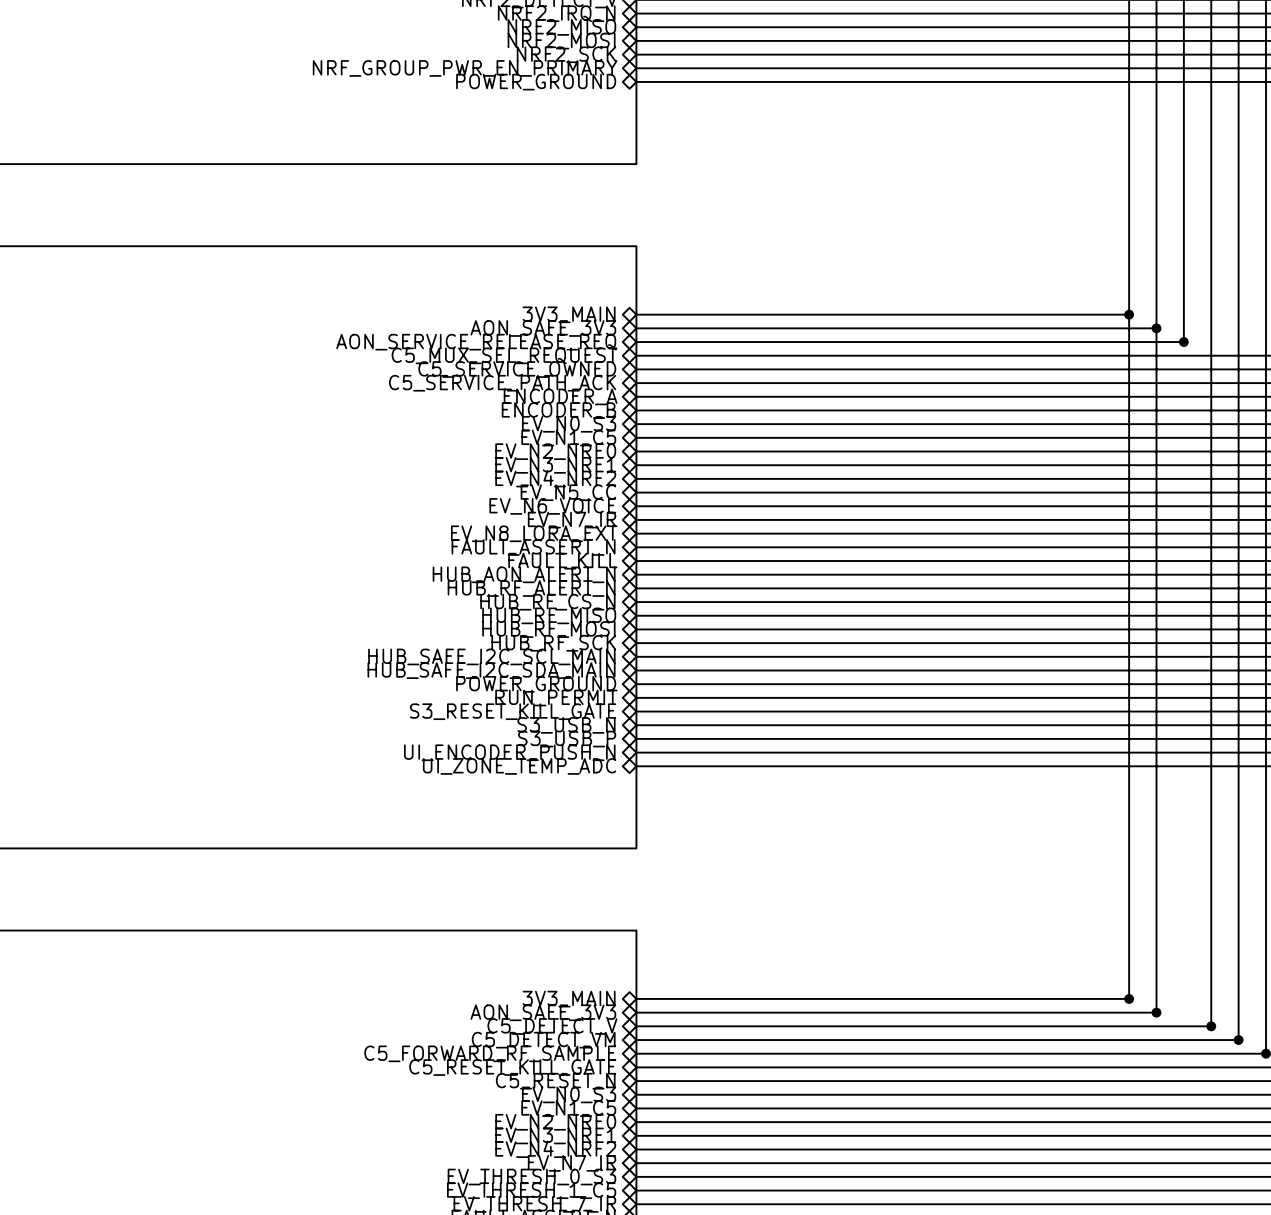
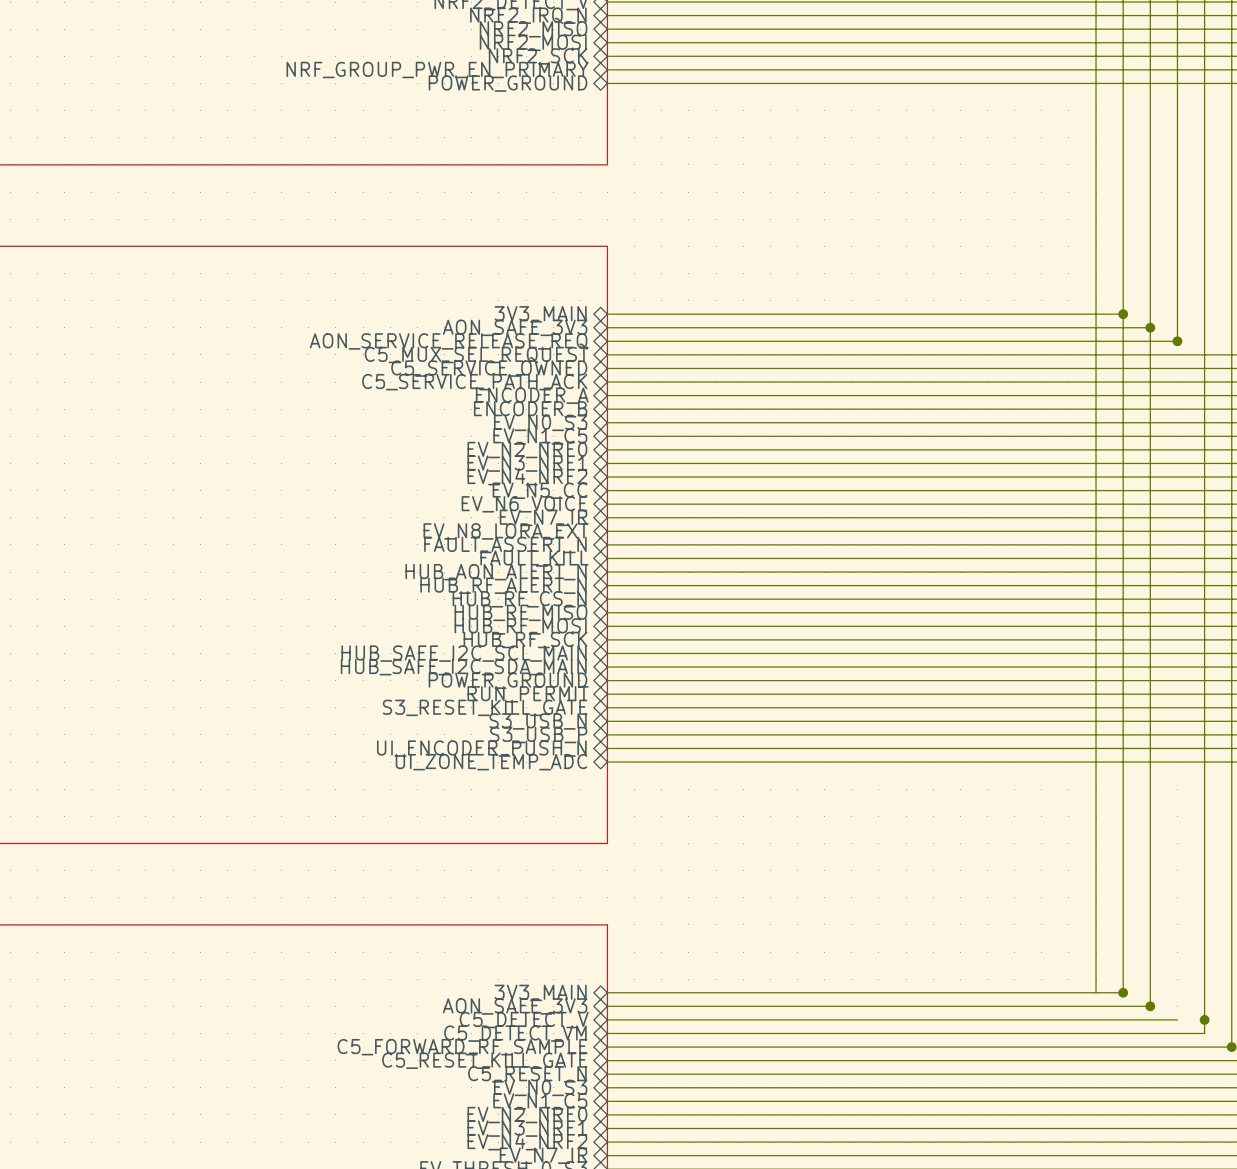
wire: none -> (1096, 314) (1123, 314)
junction: (1129, 314) -> none
junction: none -> (1123, 314)
wire: none -> (1123, 327) (1150, 327)
junction: (1156, 328) -> none
junction: none -> (1150, 327)
junction: (1183, 342) -> none
wire: (1211, 342) (1211, 1026) -> (1177, 341) (1150, 341) (1150, 1006) (1123, 1006)
junction: none -> (1177, 341)
junction: (1129, 998) -> none
wire: (1156, 998) (1156, 1012) -> (1123, 992) (1096, 992)
junction: none -> (1123, 992)
junction: (1156, 1012) -> none
junction: none -> (1150, 1006)
junction: (1211, 1026) -> none
junction: none -> (1204, 1019)
junction: (1238, 1040) -> none

